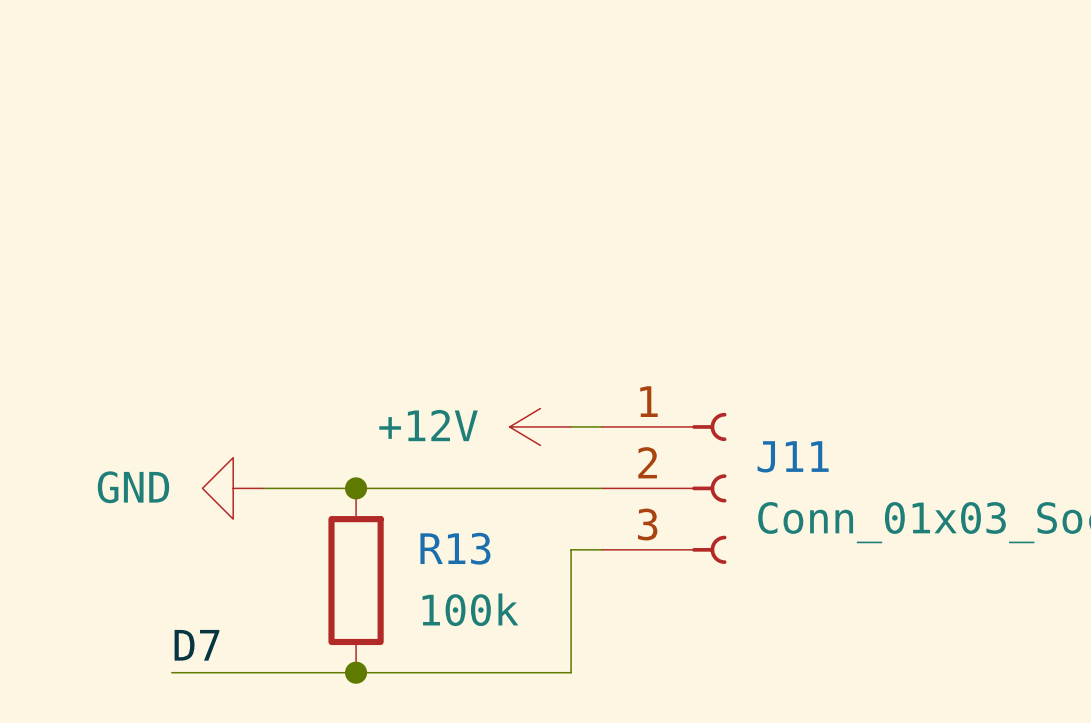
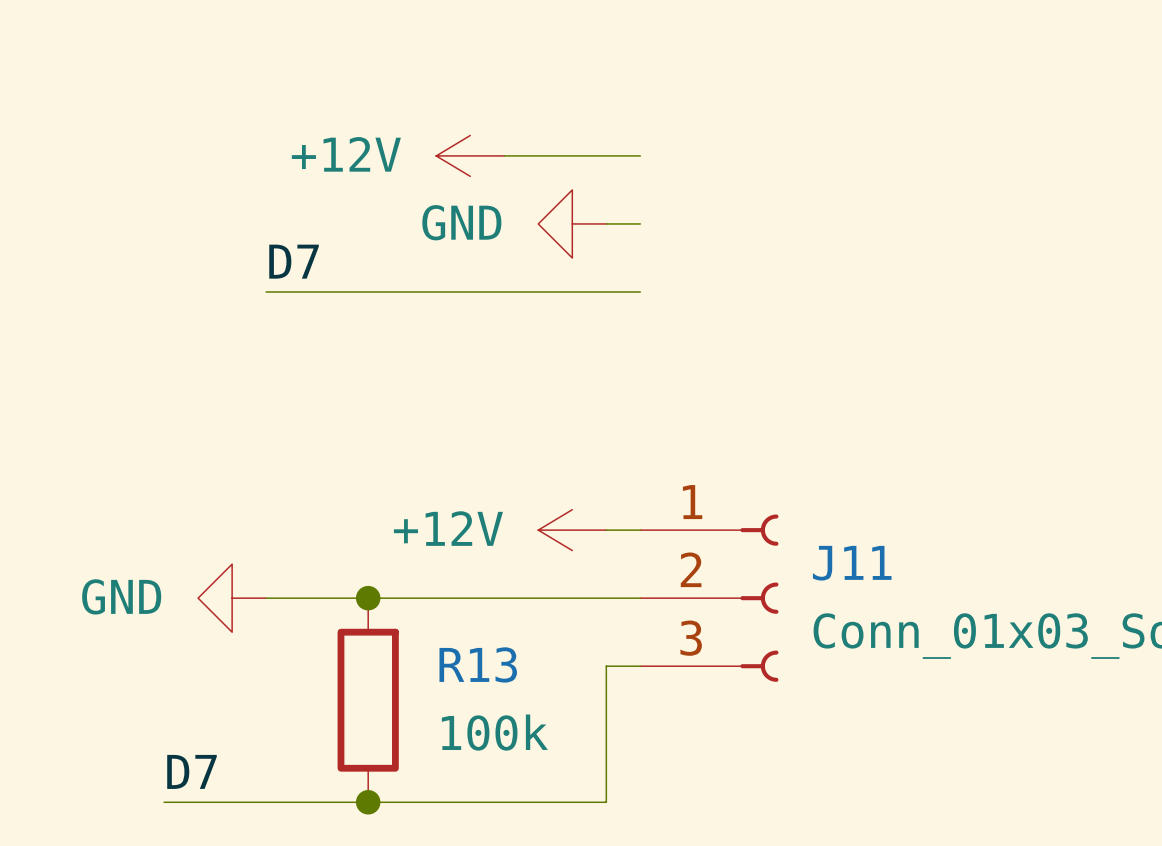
power symbol: none -> +12V (470, 155)
wire: none -> (504, 155) (640, 155)
power symbol: none -> GND (572, 223)
wire: none -> (606, 223) (640, 223)
label: none -> D7 (294, 261)
wire: none -> (266, 292) (640, 292)

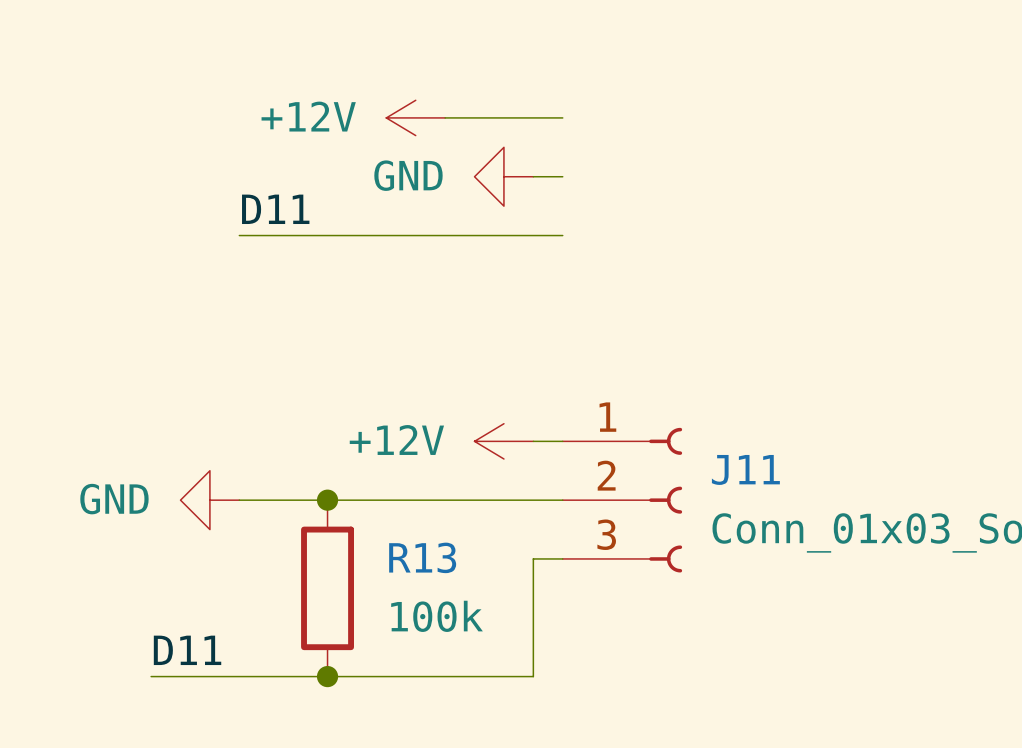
label: D7 (294, 261) -> D11 (275, 209)
label: D7 (191, 771) -> D11 (187, 650)

